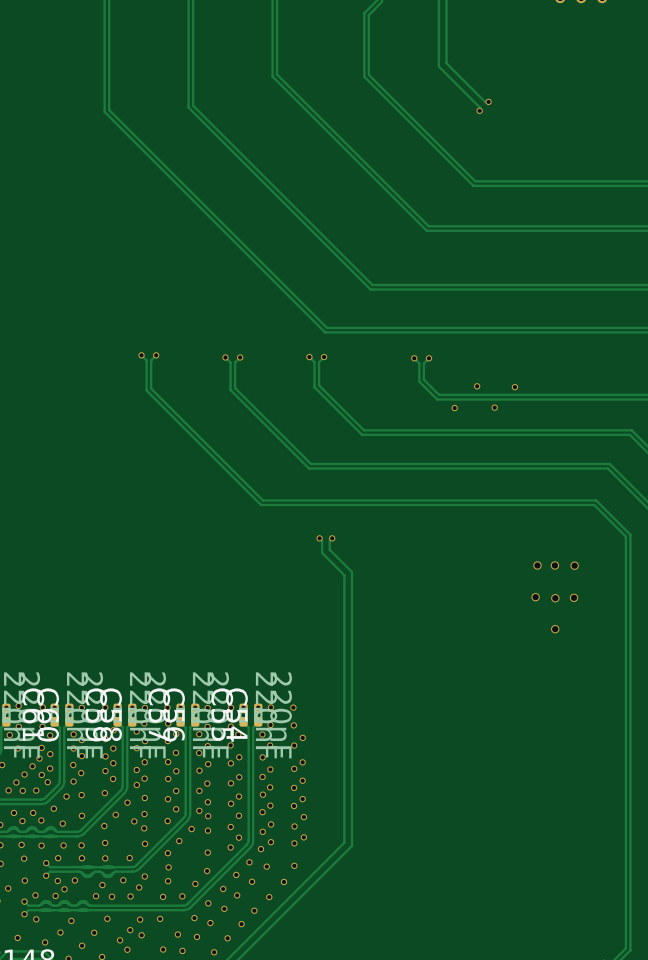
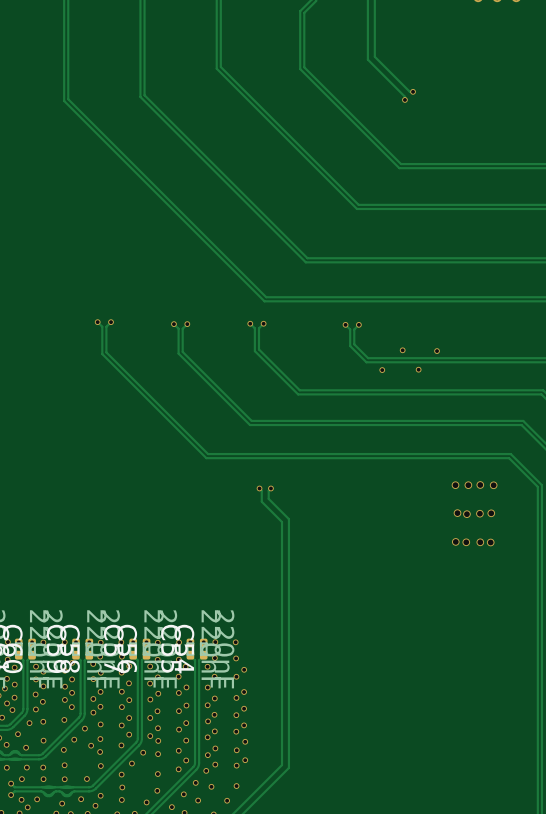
via: none -> (455, 485)
via: none -> (468, 485)
via: none -> (480, 484)
via: none -> (493, 485)
via: (554, 565) -> none
via: none -> (466, 514)
via: none -> (479, 513)
via: none -> (466, 542)
via: none -> (480, 542)
via: (555, 598) -> none
via: (555, 629) -> none

